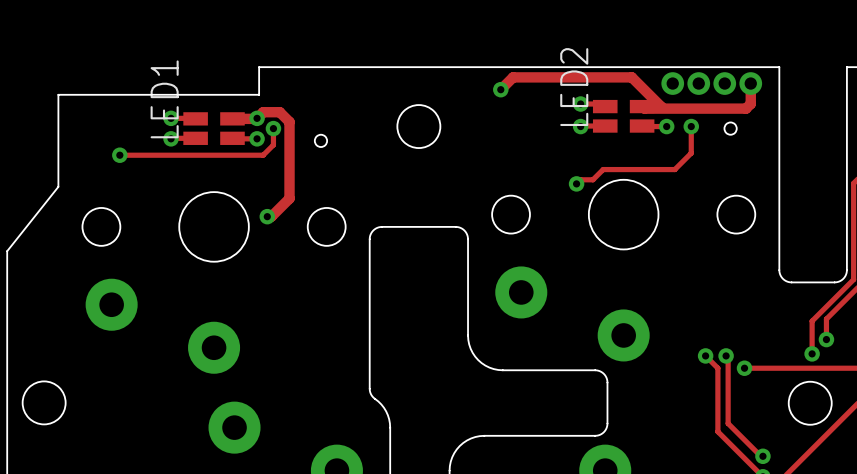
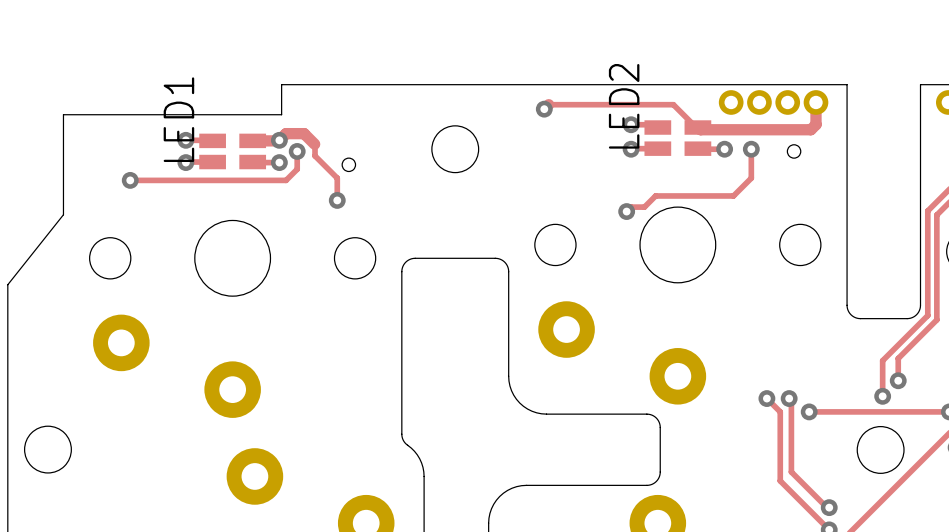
track: (504, 85) (513, 77) (631, 77) (661, 106) (642, 106) -> (548, 104) (673, 104) (702, 131) (808, 131) (810, 129)
track: (289, 121) (289, 198) (271, 216) (267, 216) -> (315, 144) (315, 155) (337, 178) (337, 200)
via position: (267, 216) -> (337, 200)

